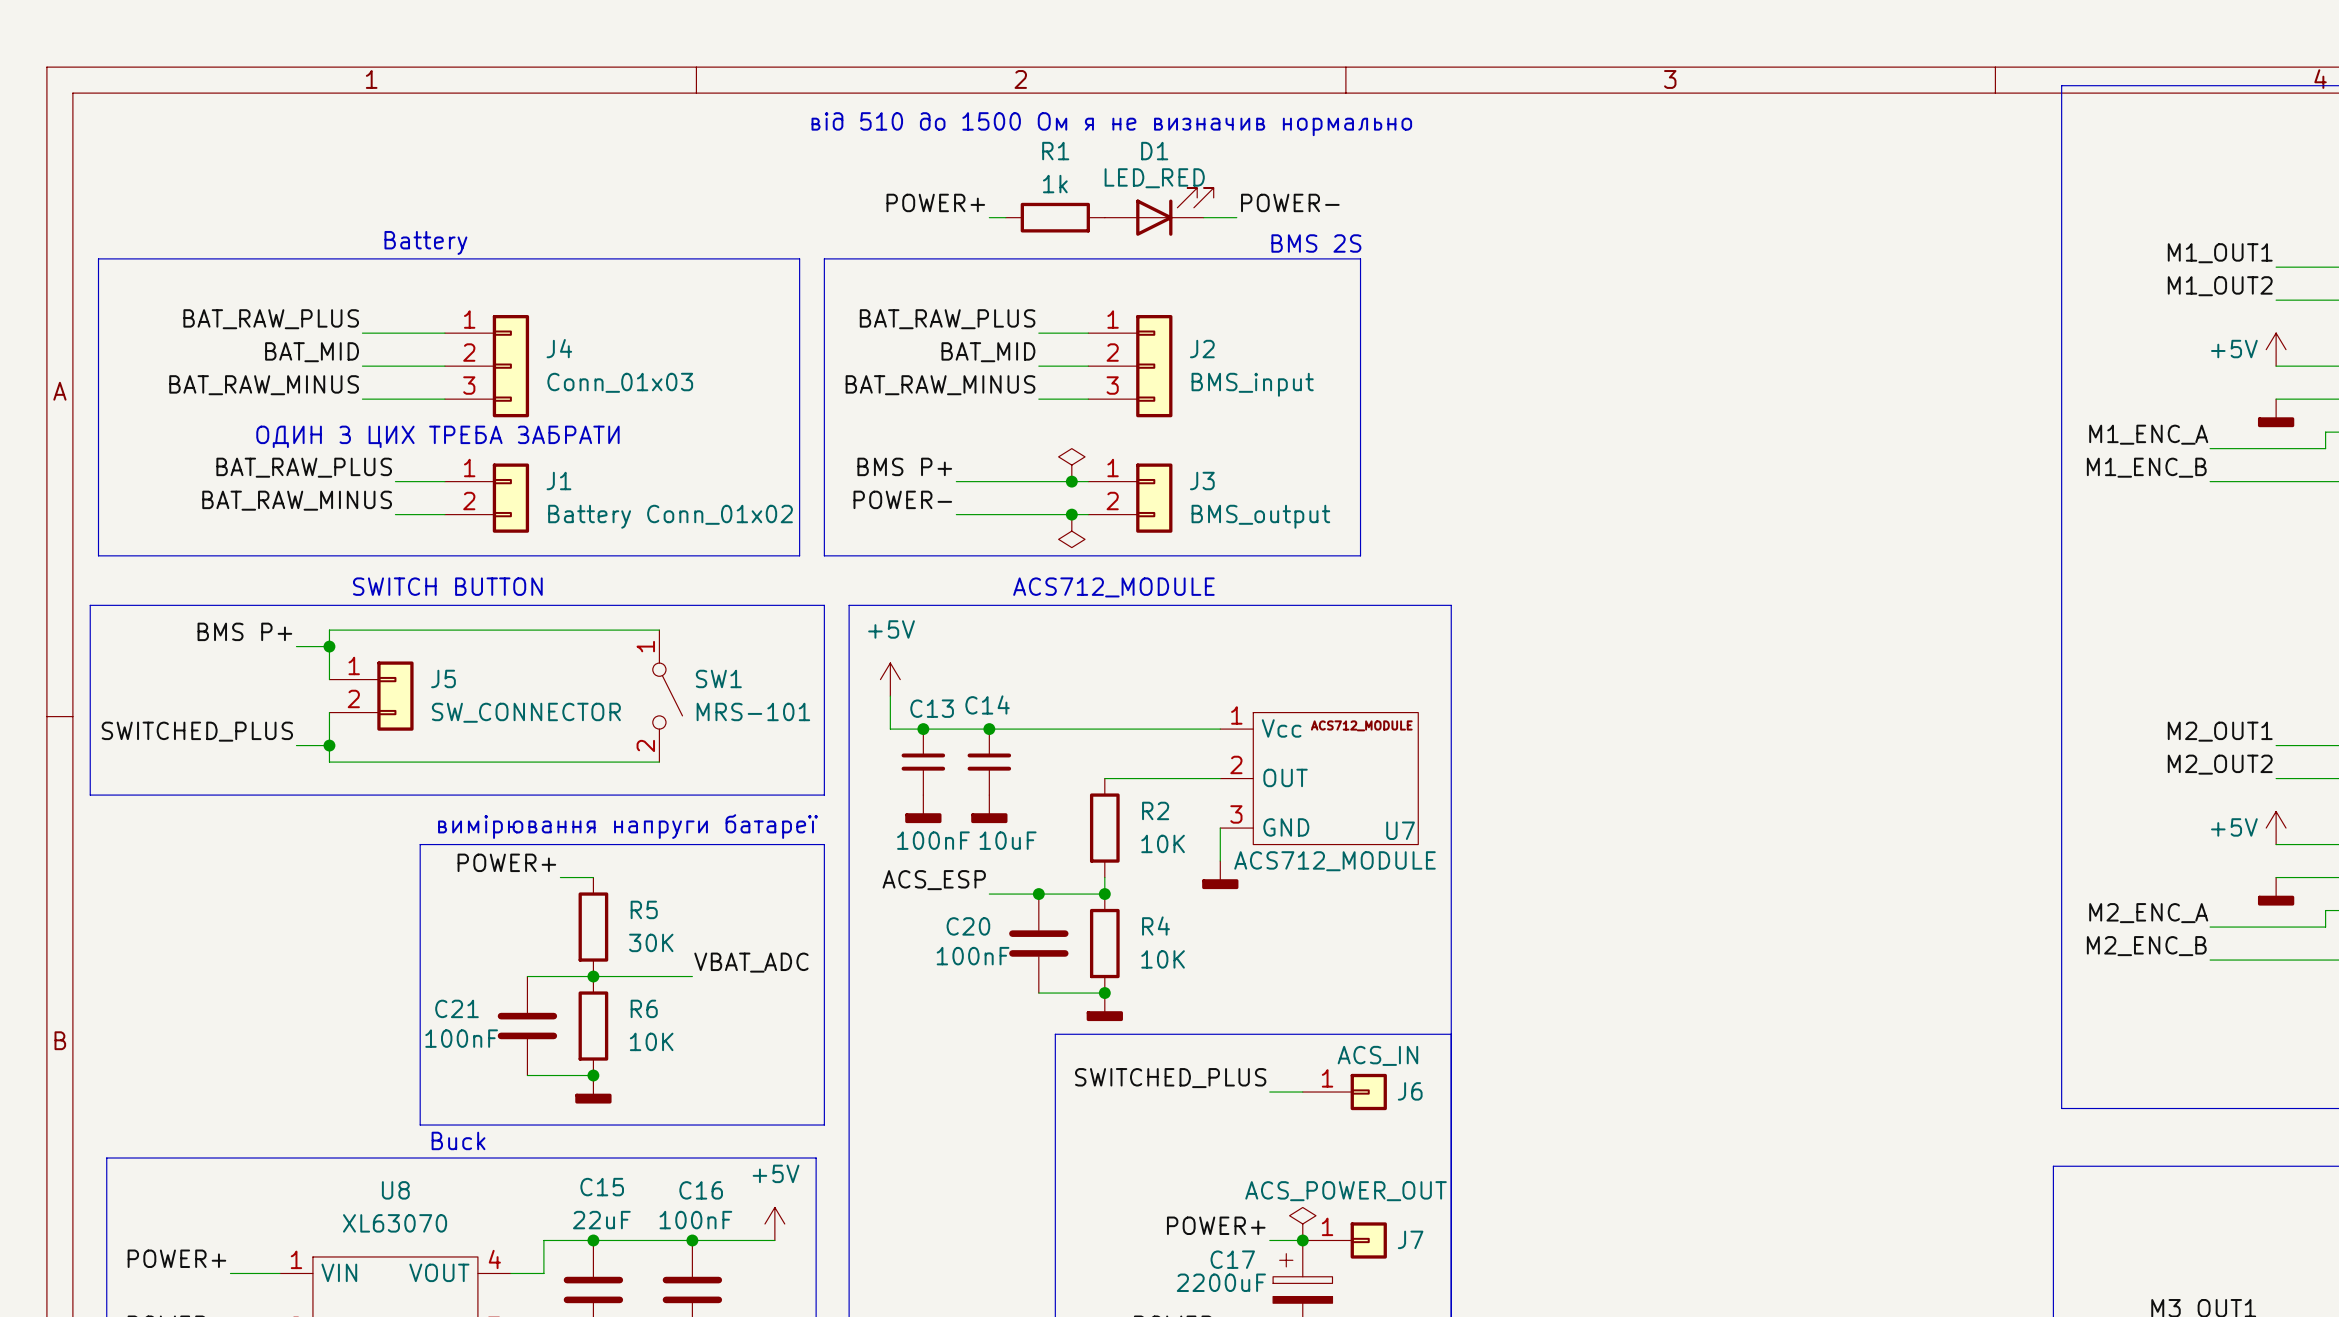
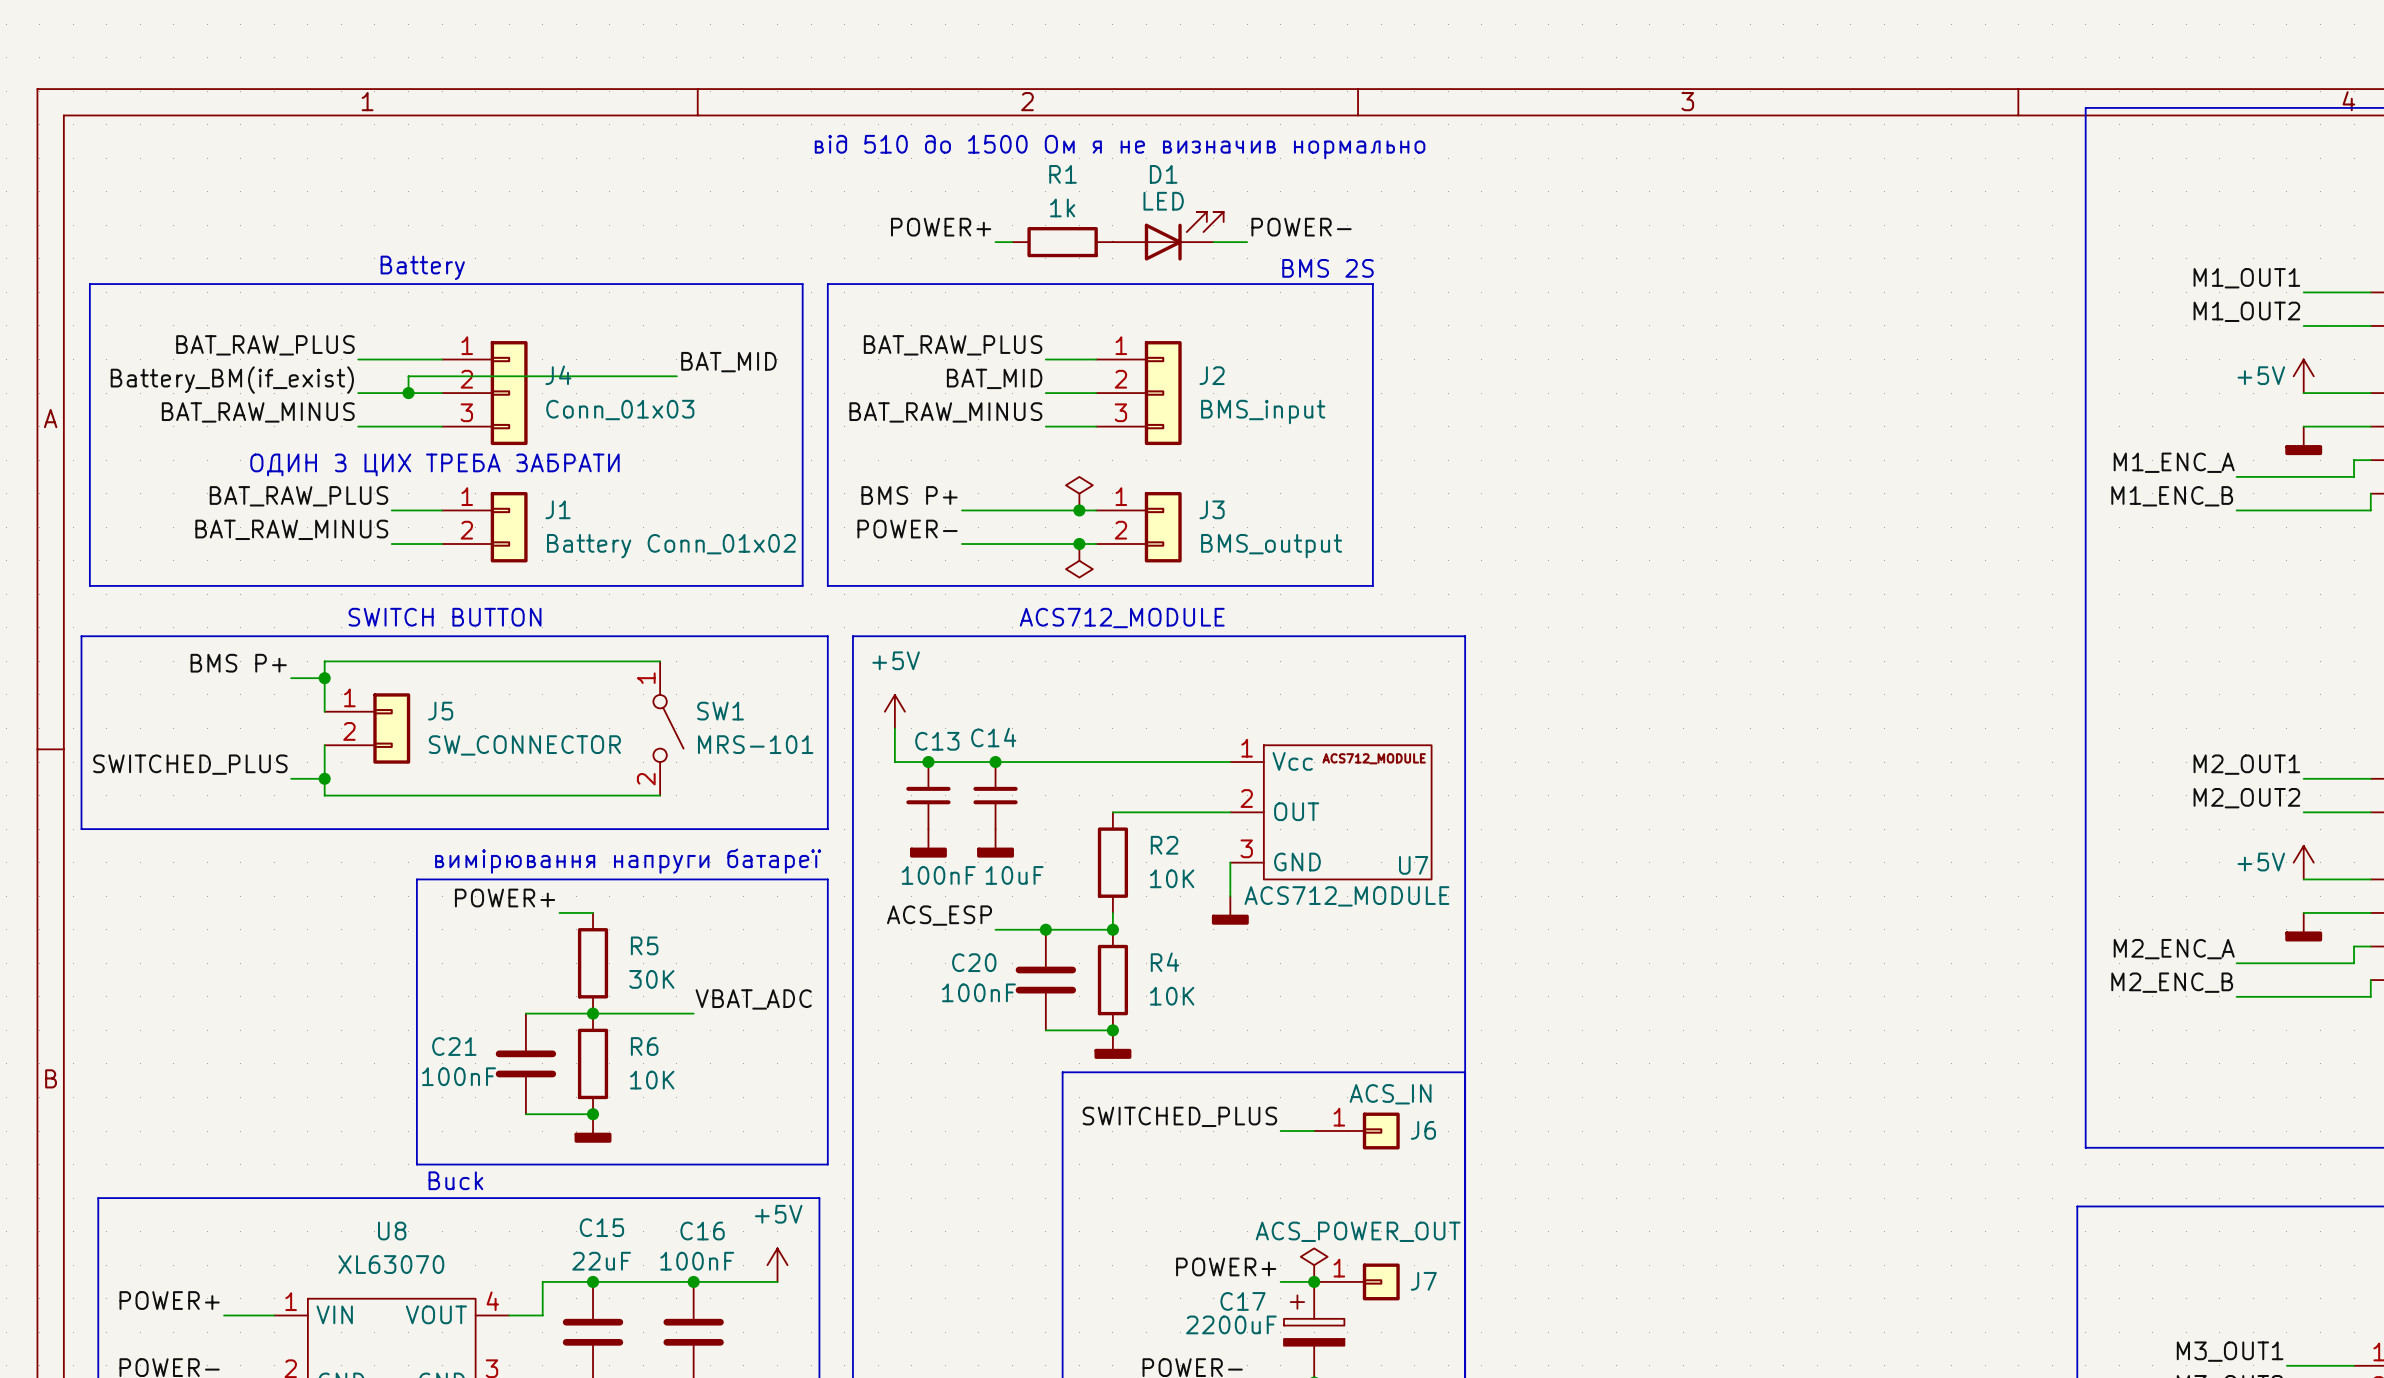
D1 value: LED_RED (1154, 178) -> LED (1163, 201)
label: none -> BAT_MID (728, 362)
wire: none -> (676, 376) (408, 376) (408, 393)
label: BAT_MID (312, 352) -> Battery_BM(if_exist) (232, 380)
junction: none -> (408, 393)

